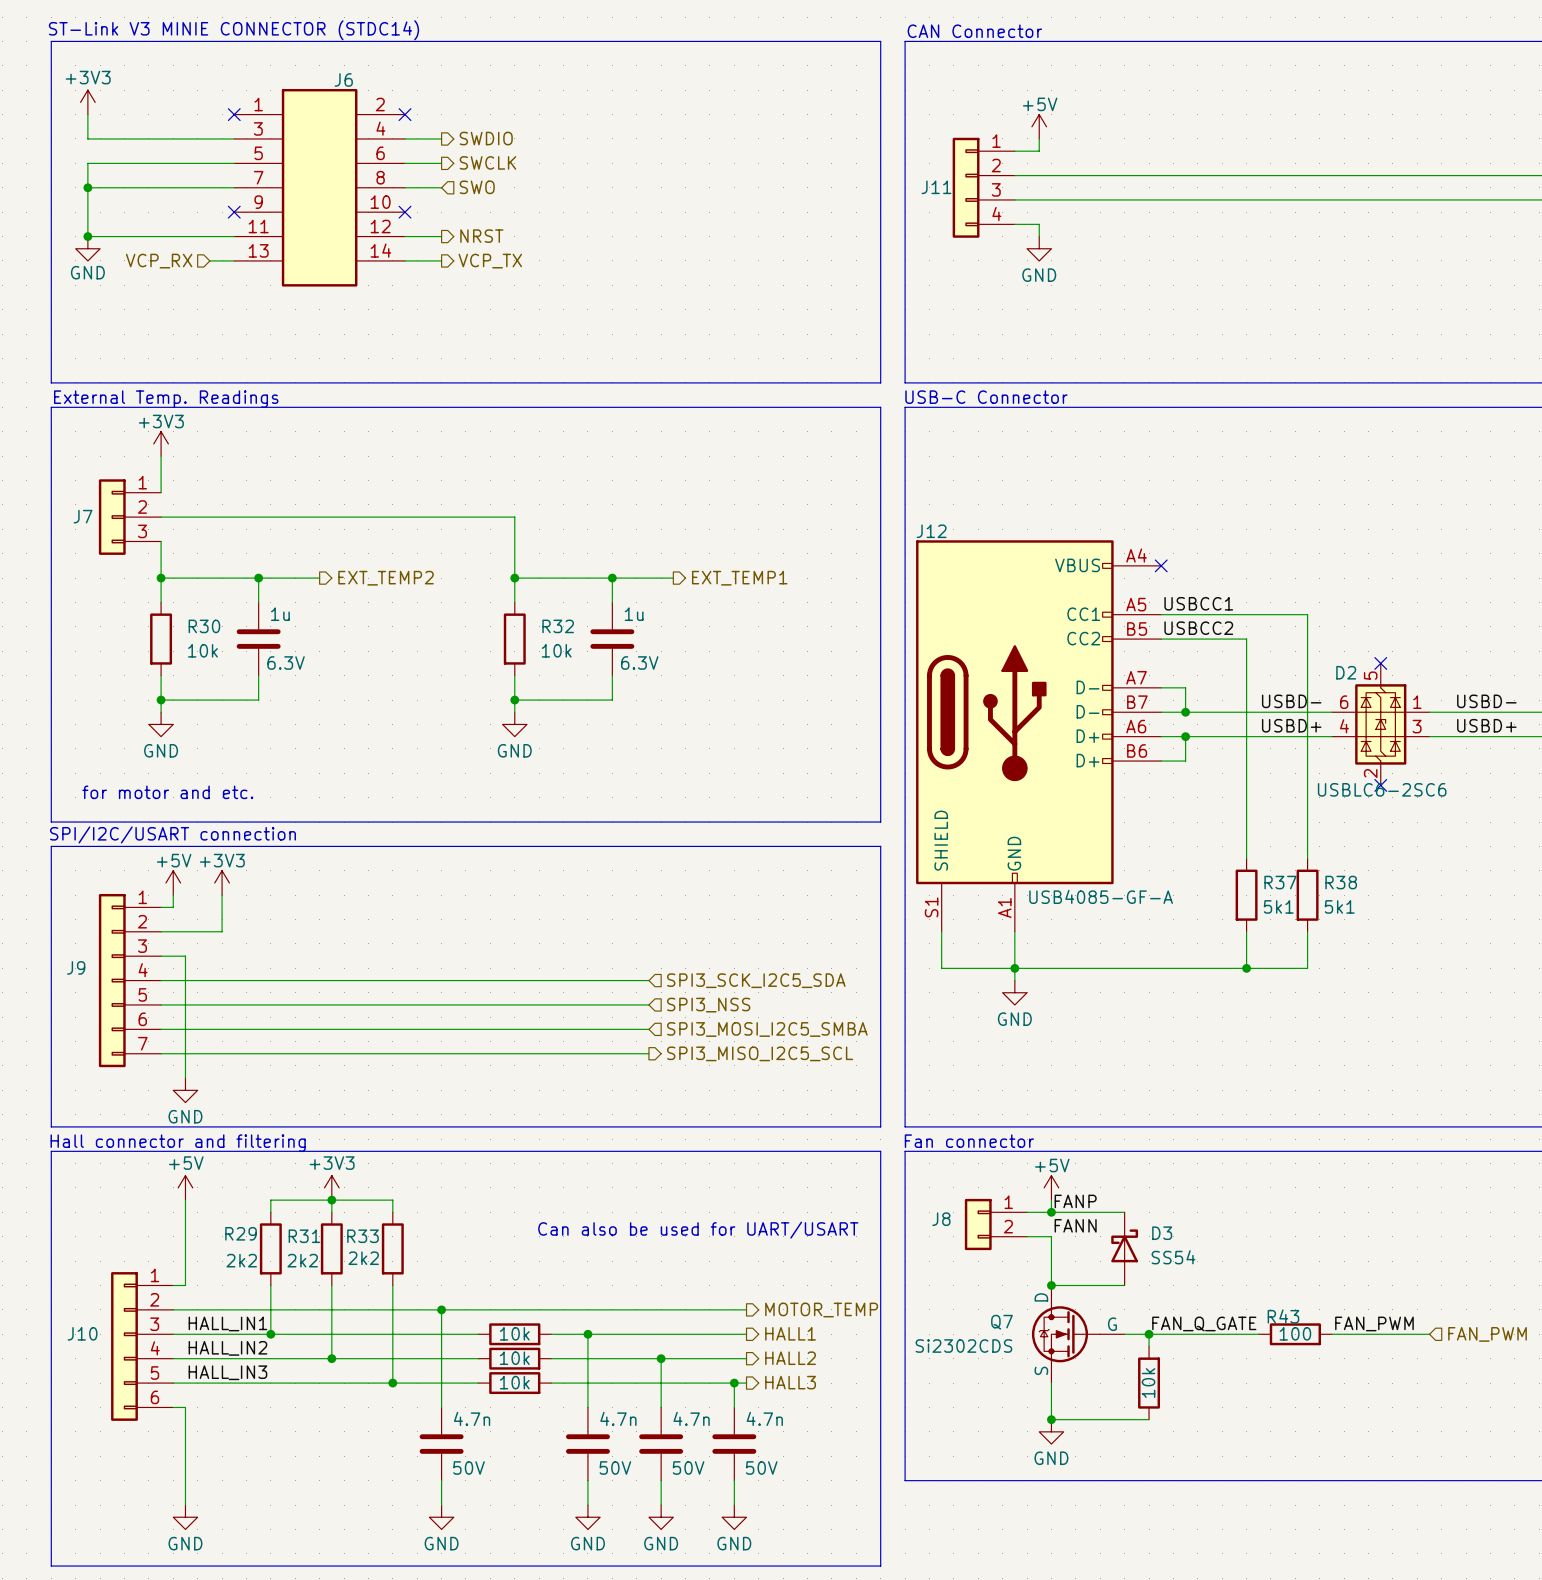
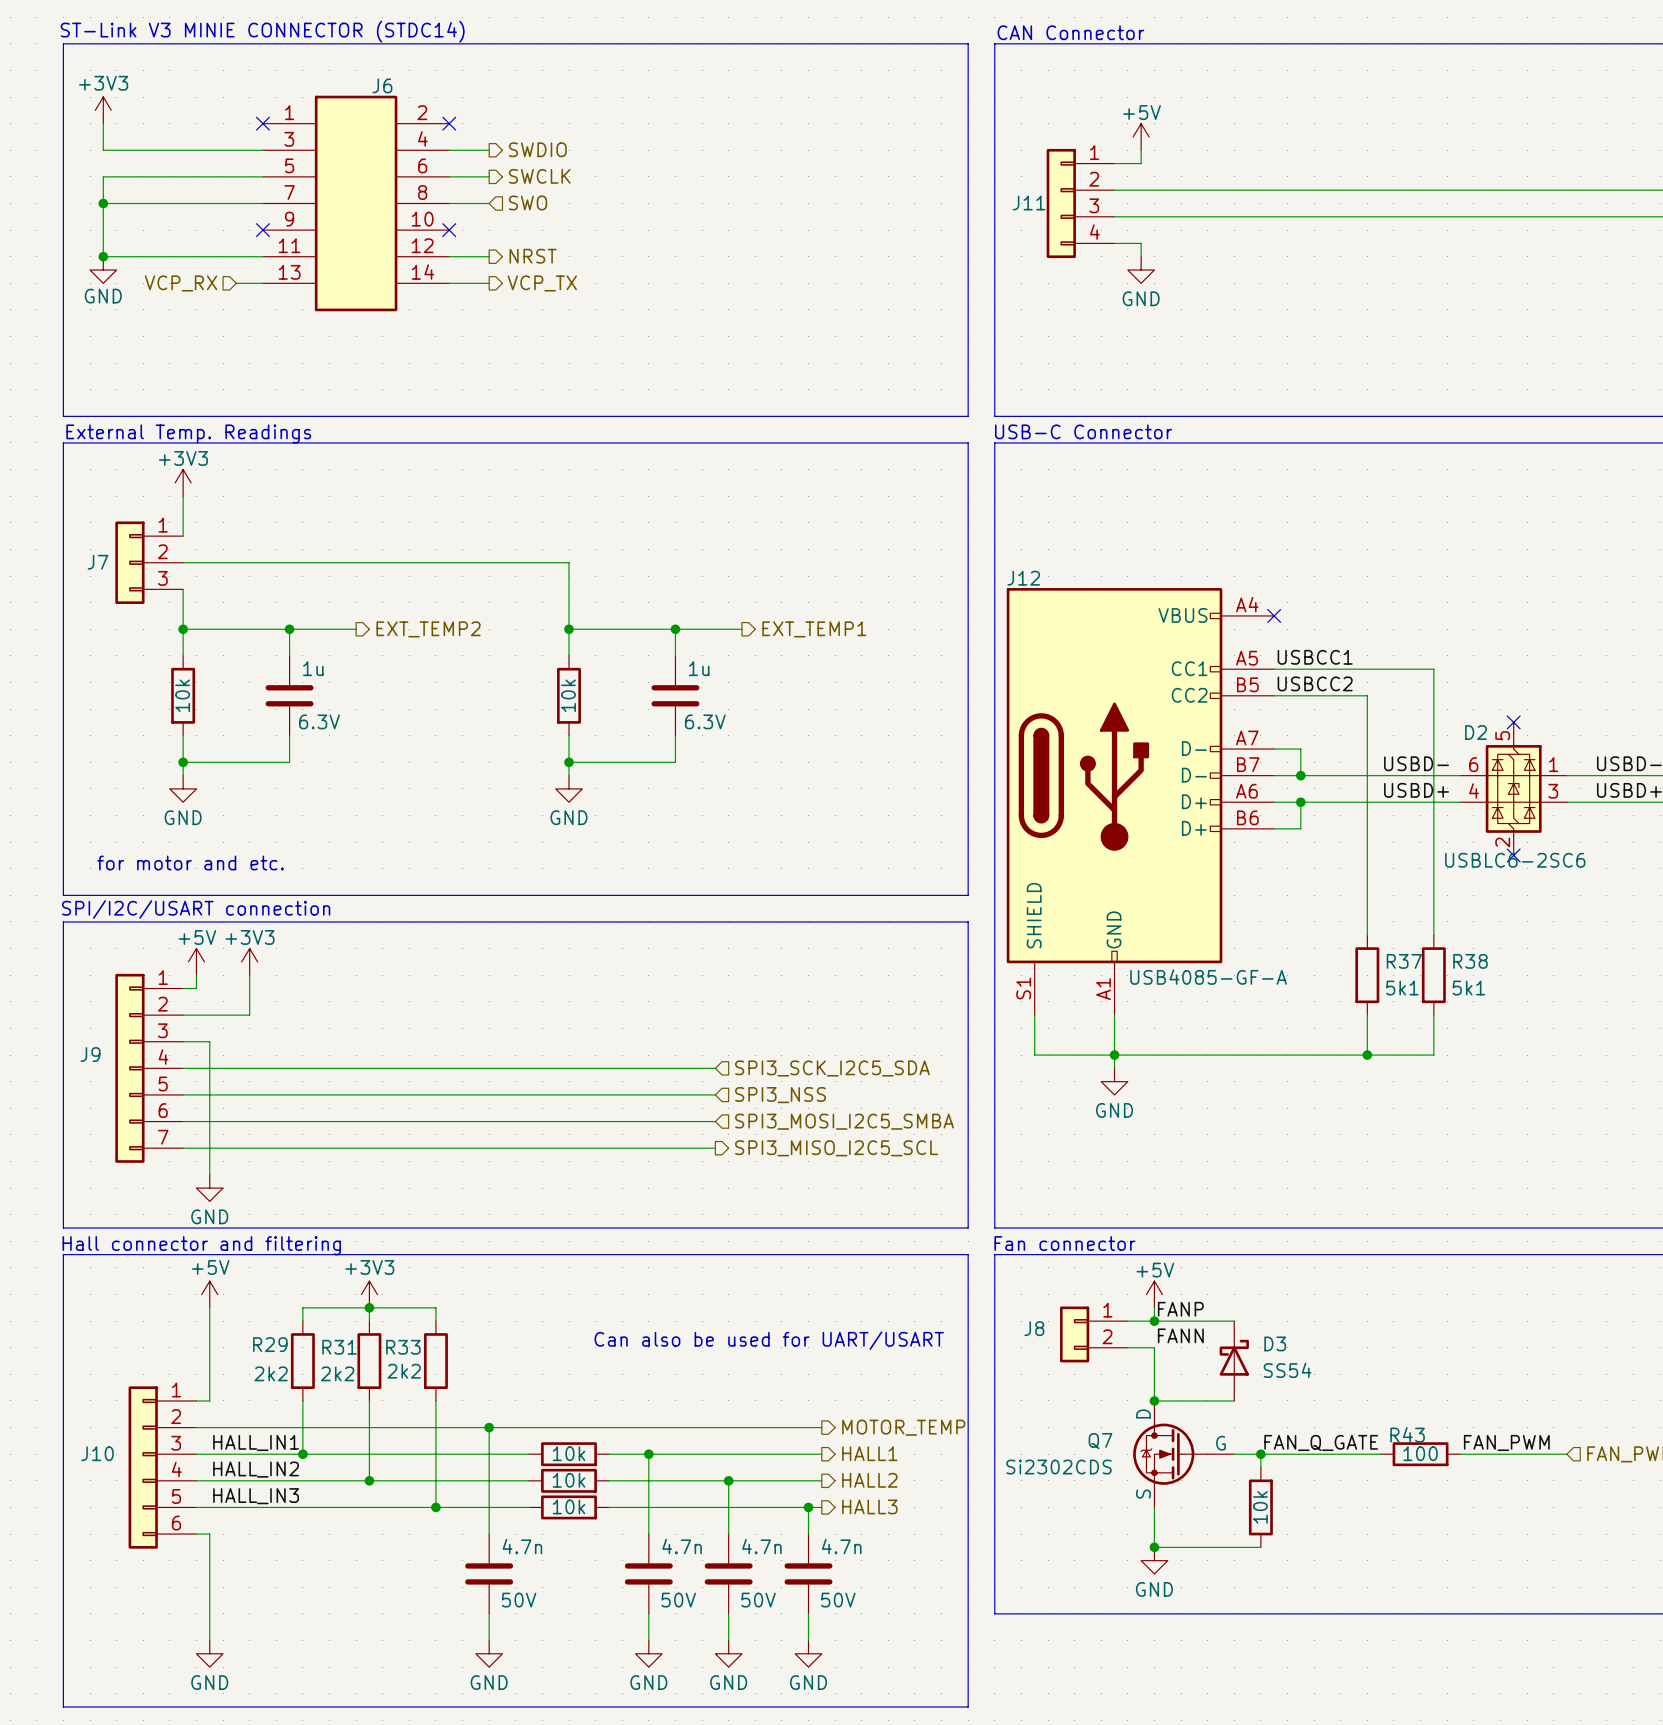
R30 name: R30 (204, 626) -> none
R32 name: R32 (558, 626) -> none
R30 value rotation: 0° (202, 650) -> 90° counterclockwise (182, 695)
R30 value position: 10k (202, 650) -> 10k (182, 695)
R32 value rotation: 0° (556, 650) -> 90° counterclockwise (568, 695)
R32 value position: 10k (556, 650) -> 10k (568, 695)

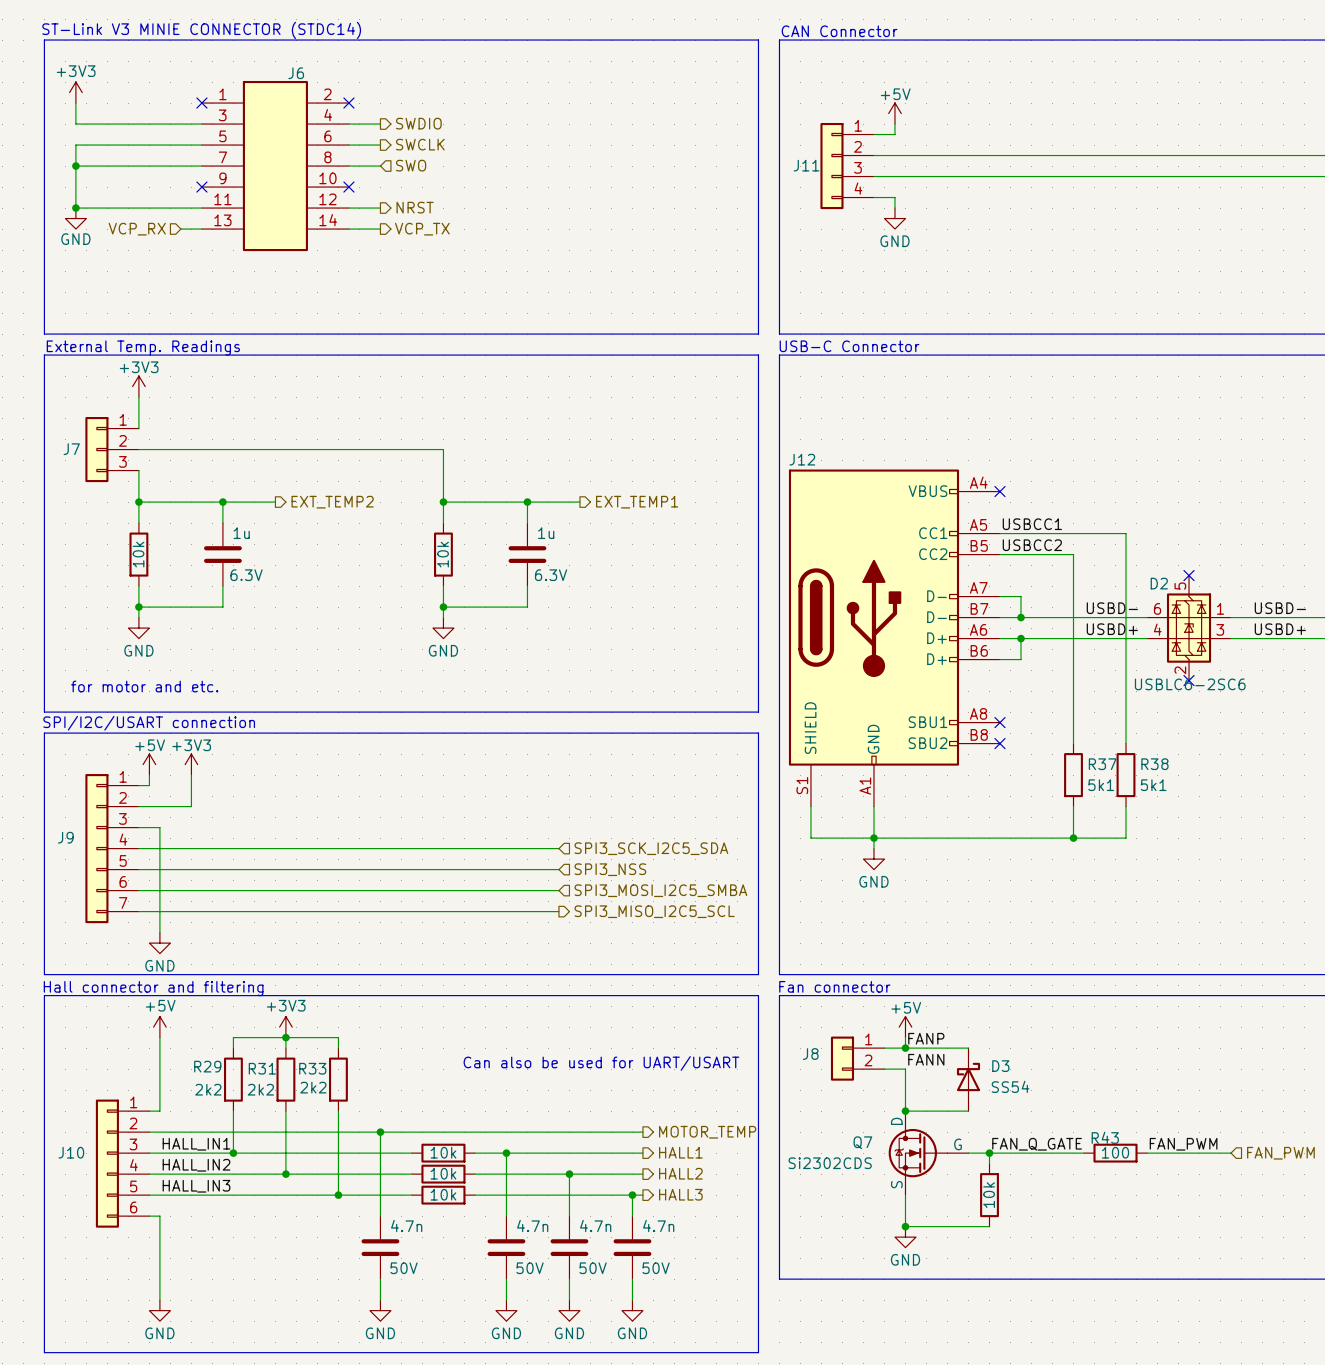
J12 symbol: [1006, 588, 1275, 1016] -> [788, 469, 1000, 807]
no-connect mark: none -> (999, 722)
no-connect mark: none -> (999, 743)
J12 value: USB4085-GF-A (1208, 977) -> none

